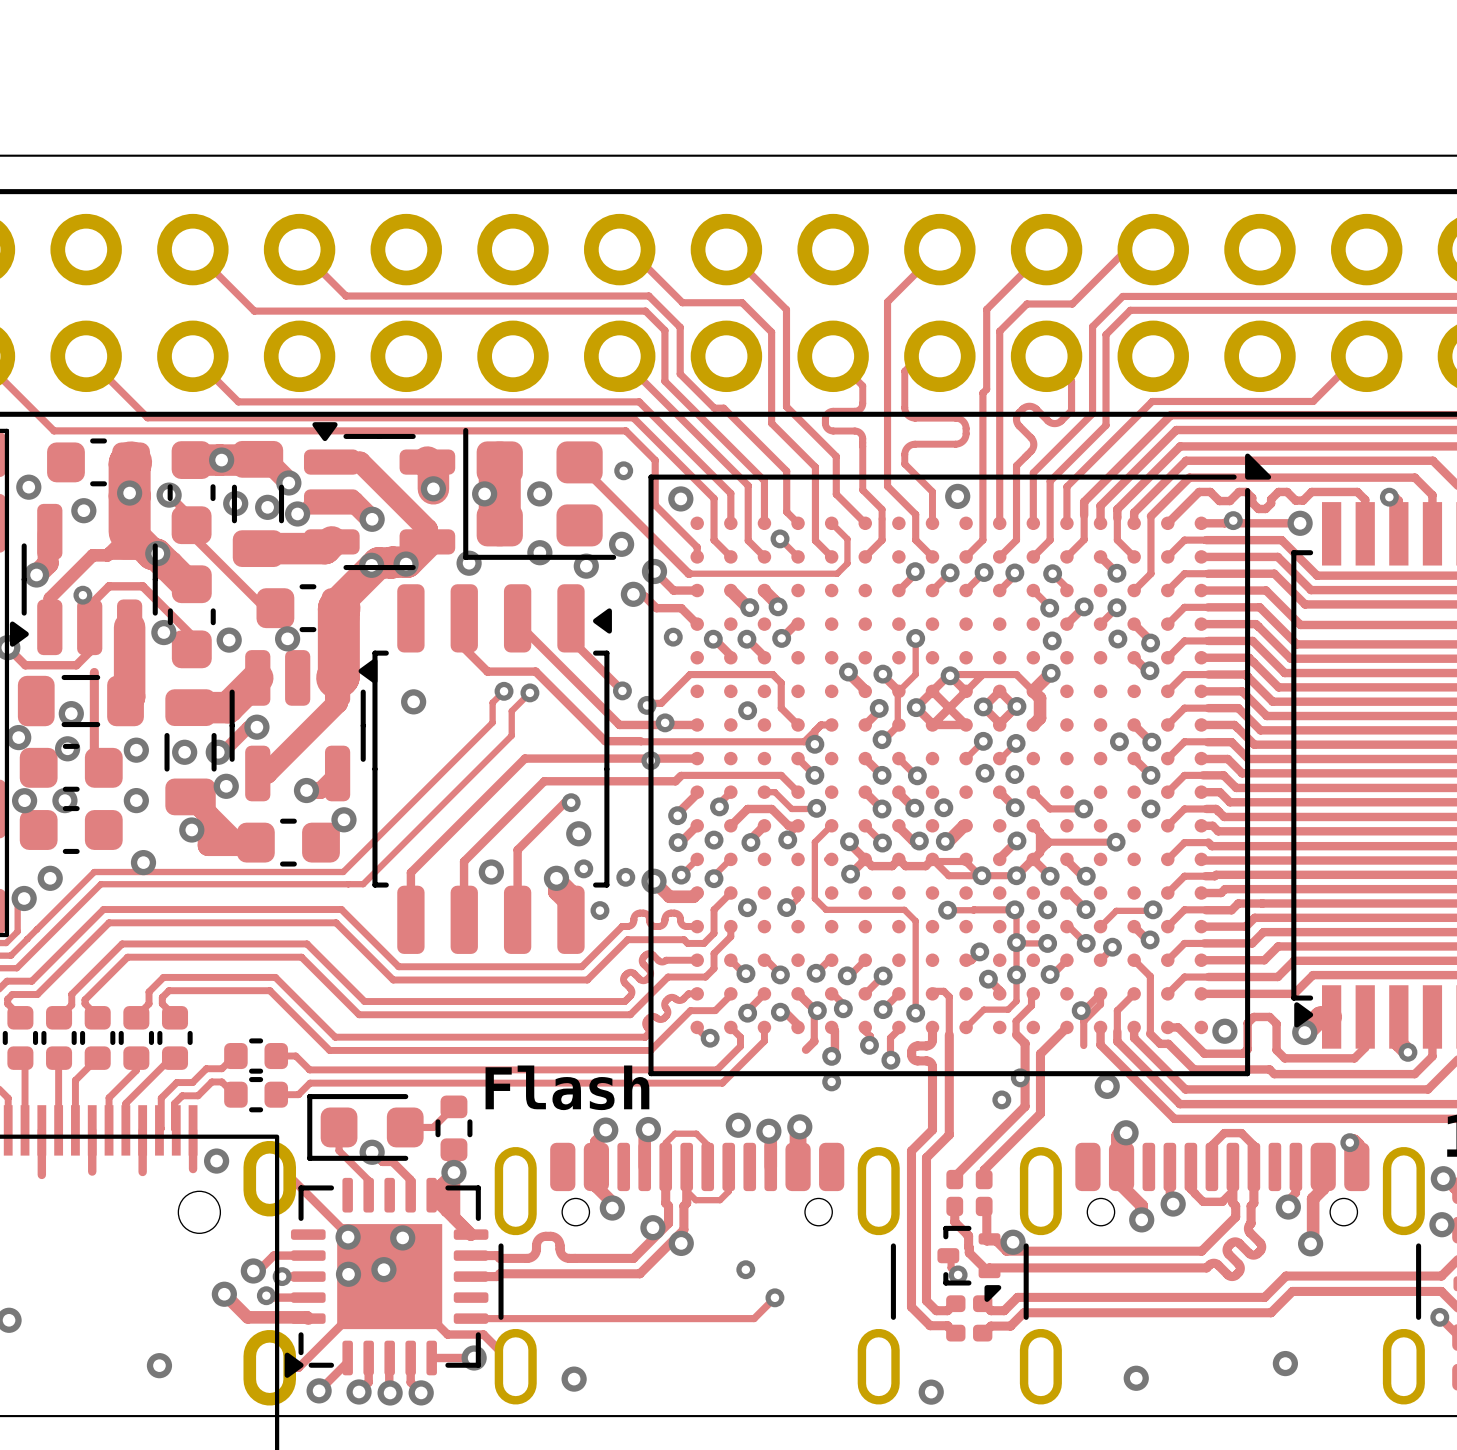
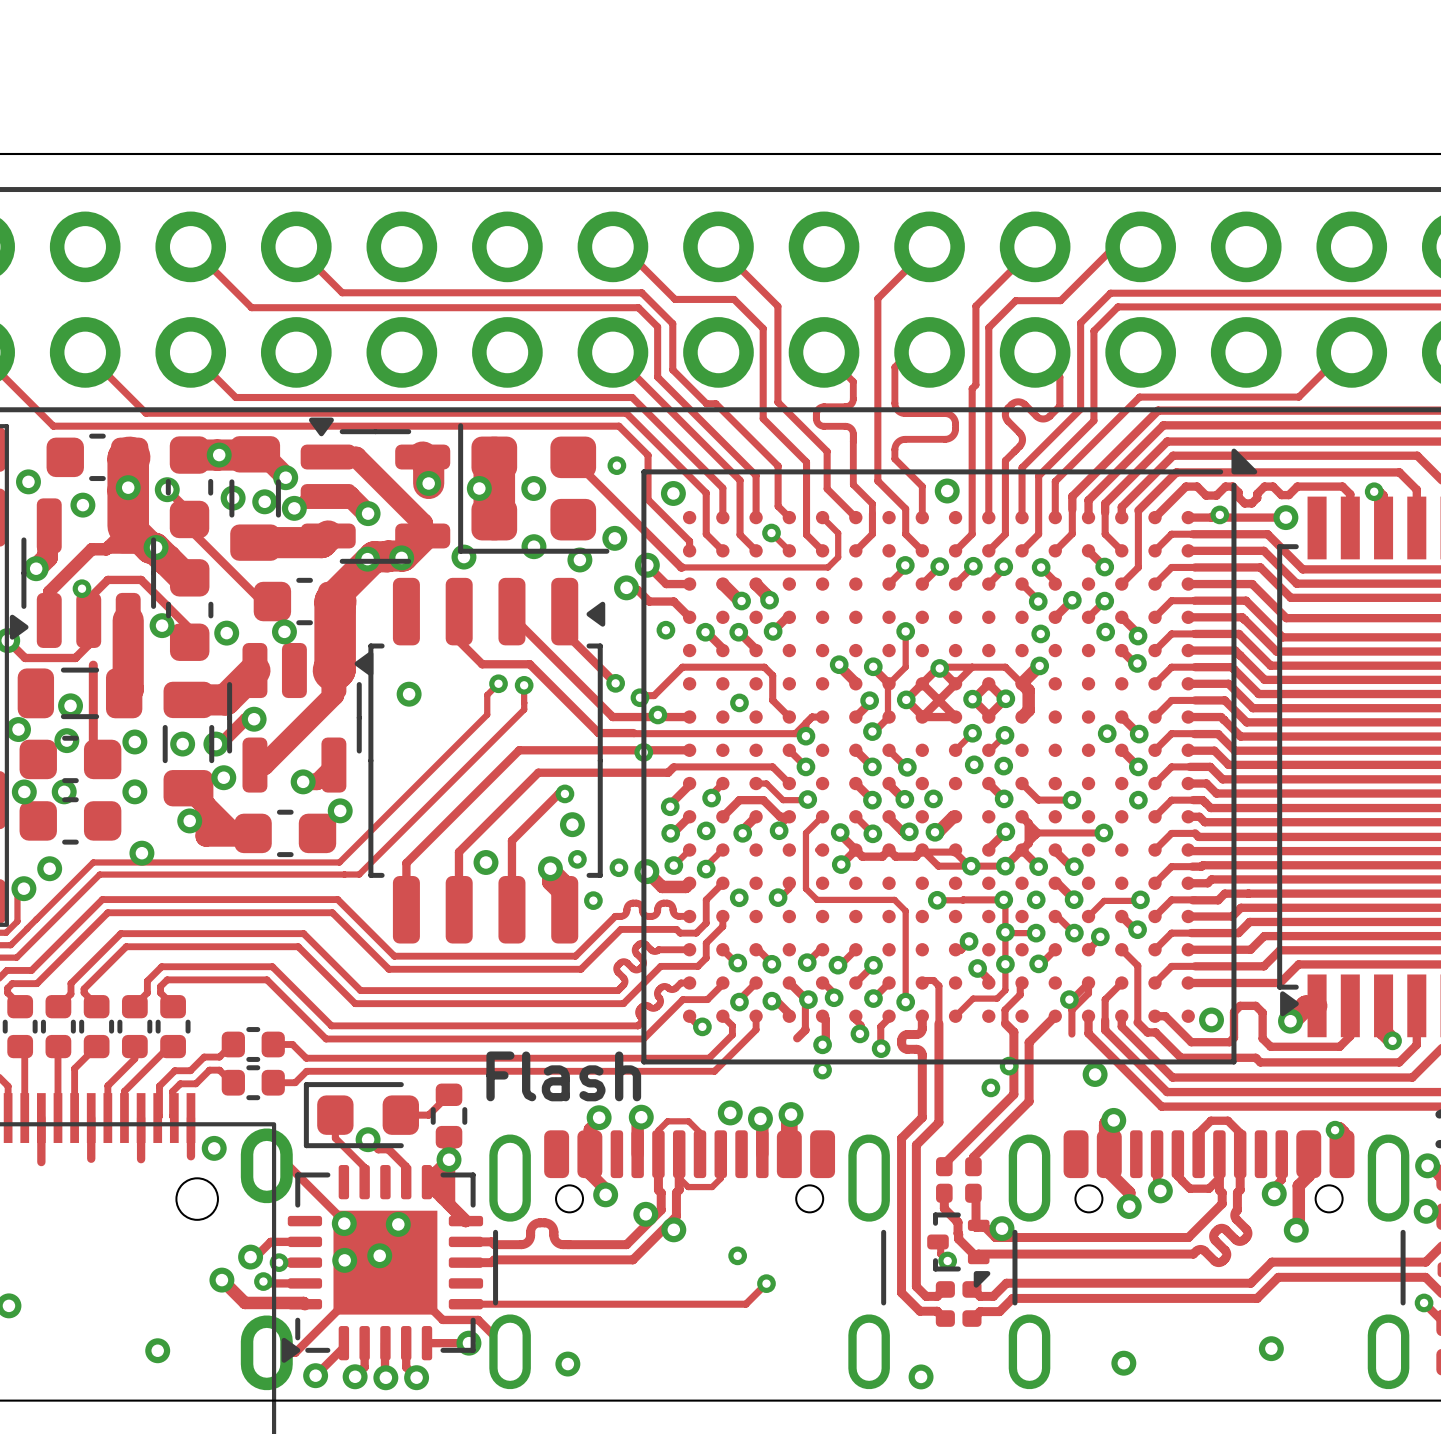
track: (529, 692) (511, 711) (511, 735) -> (524, 685) (524, 709) (506, 727)

